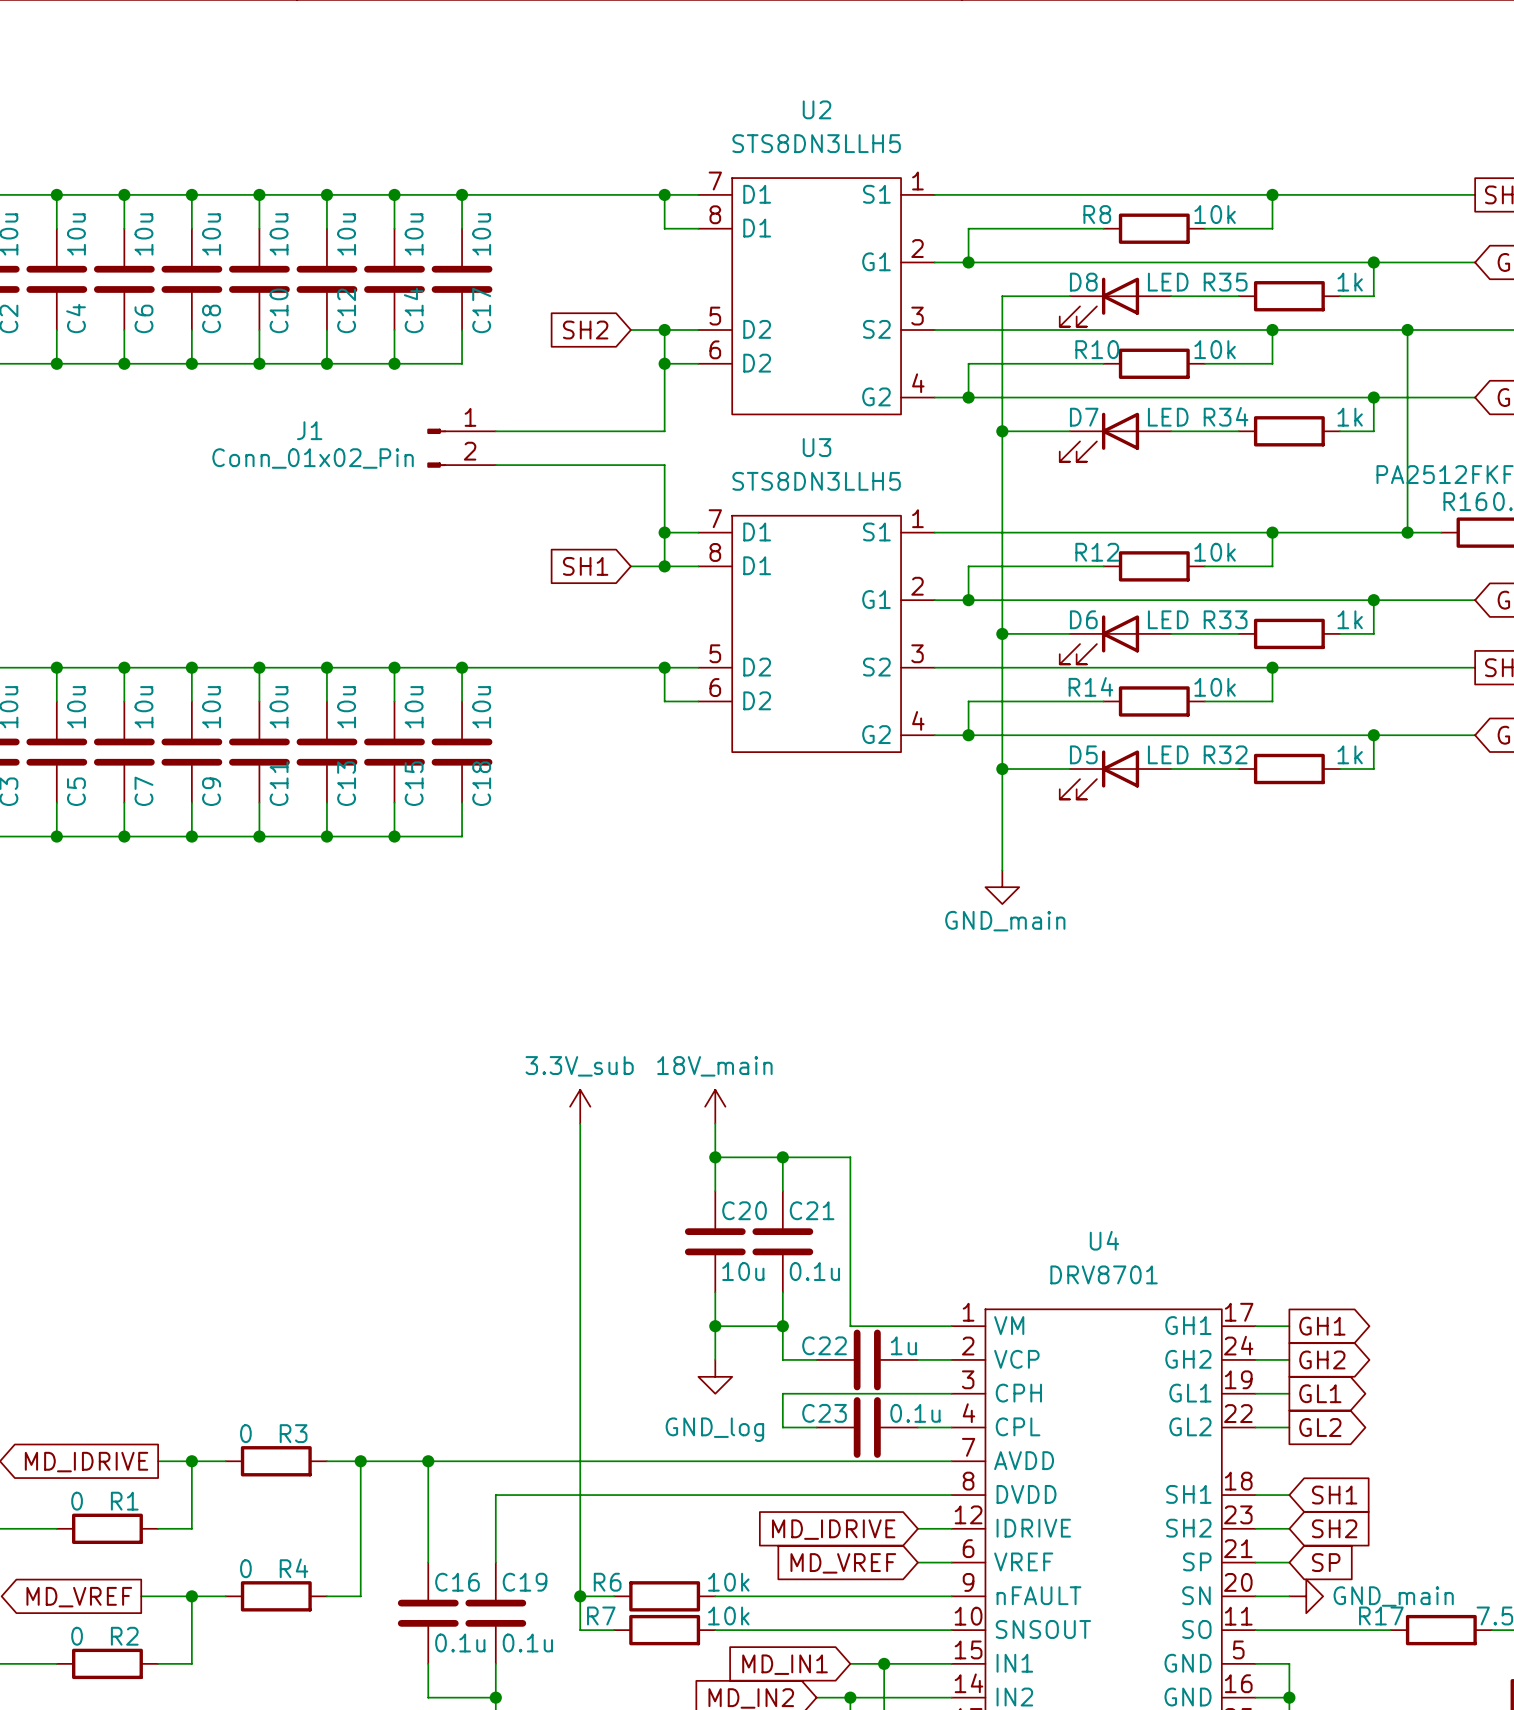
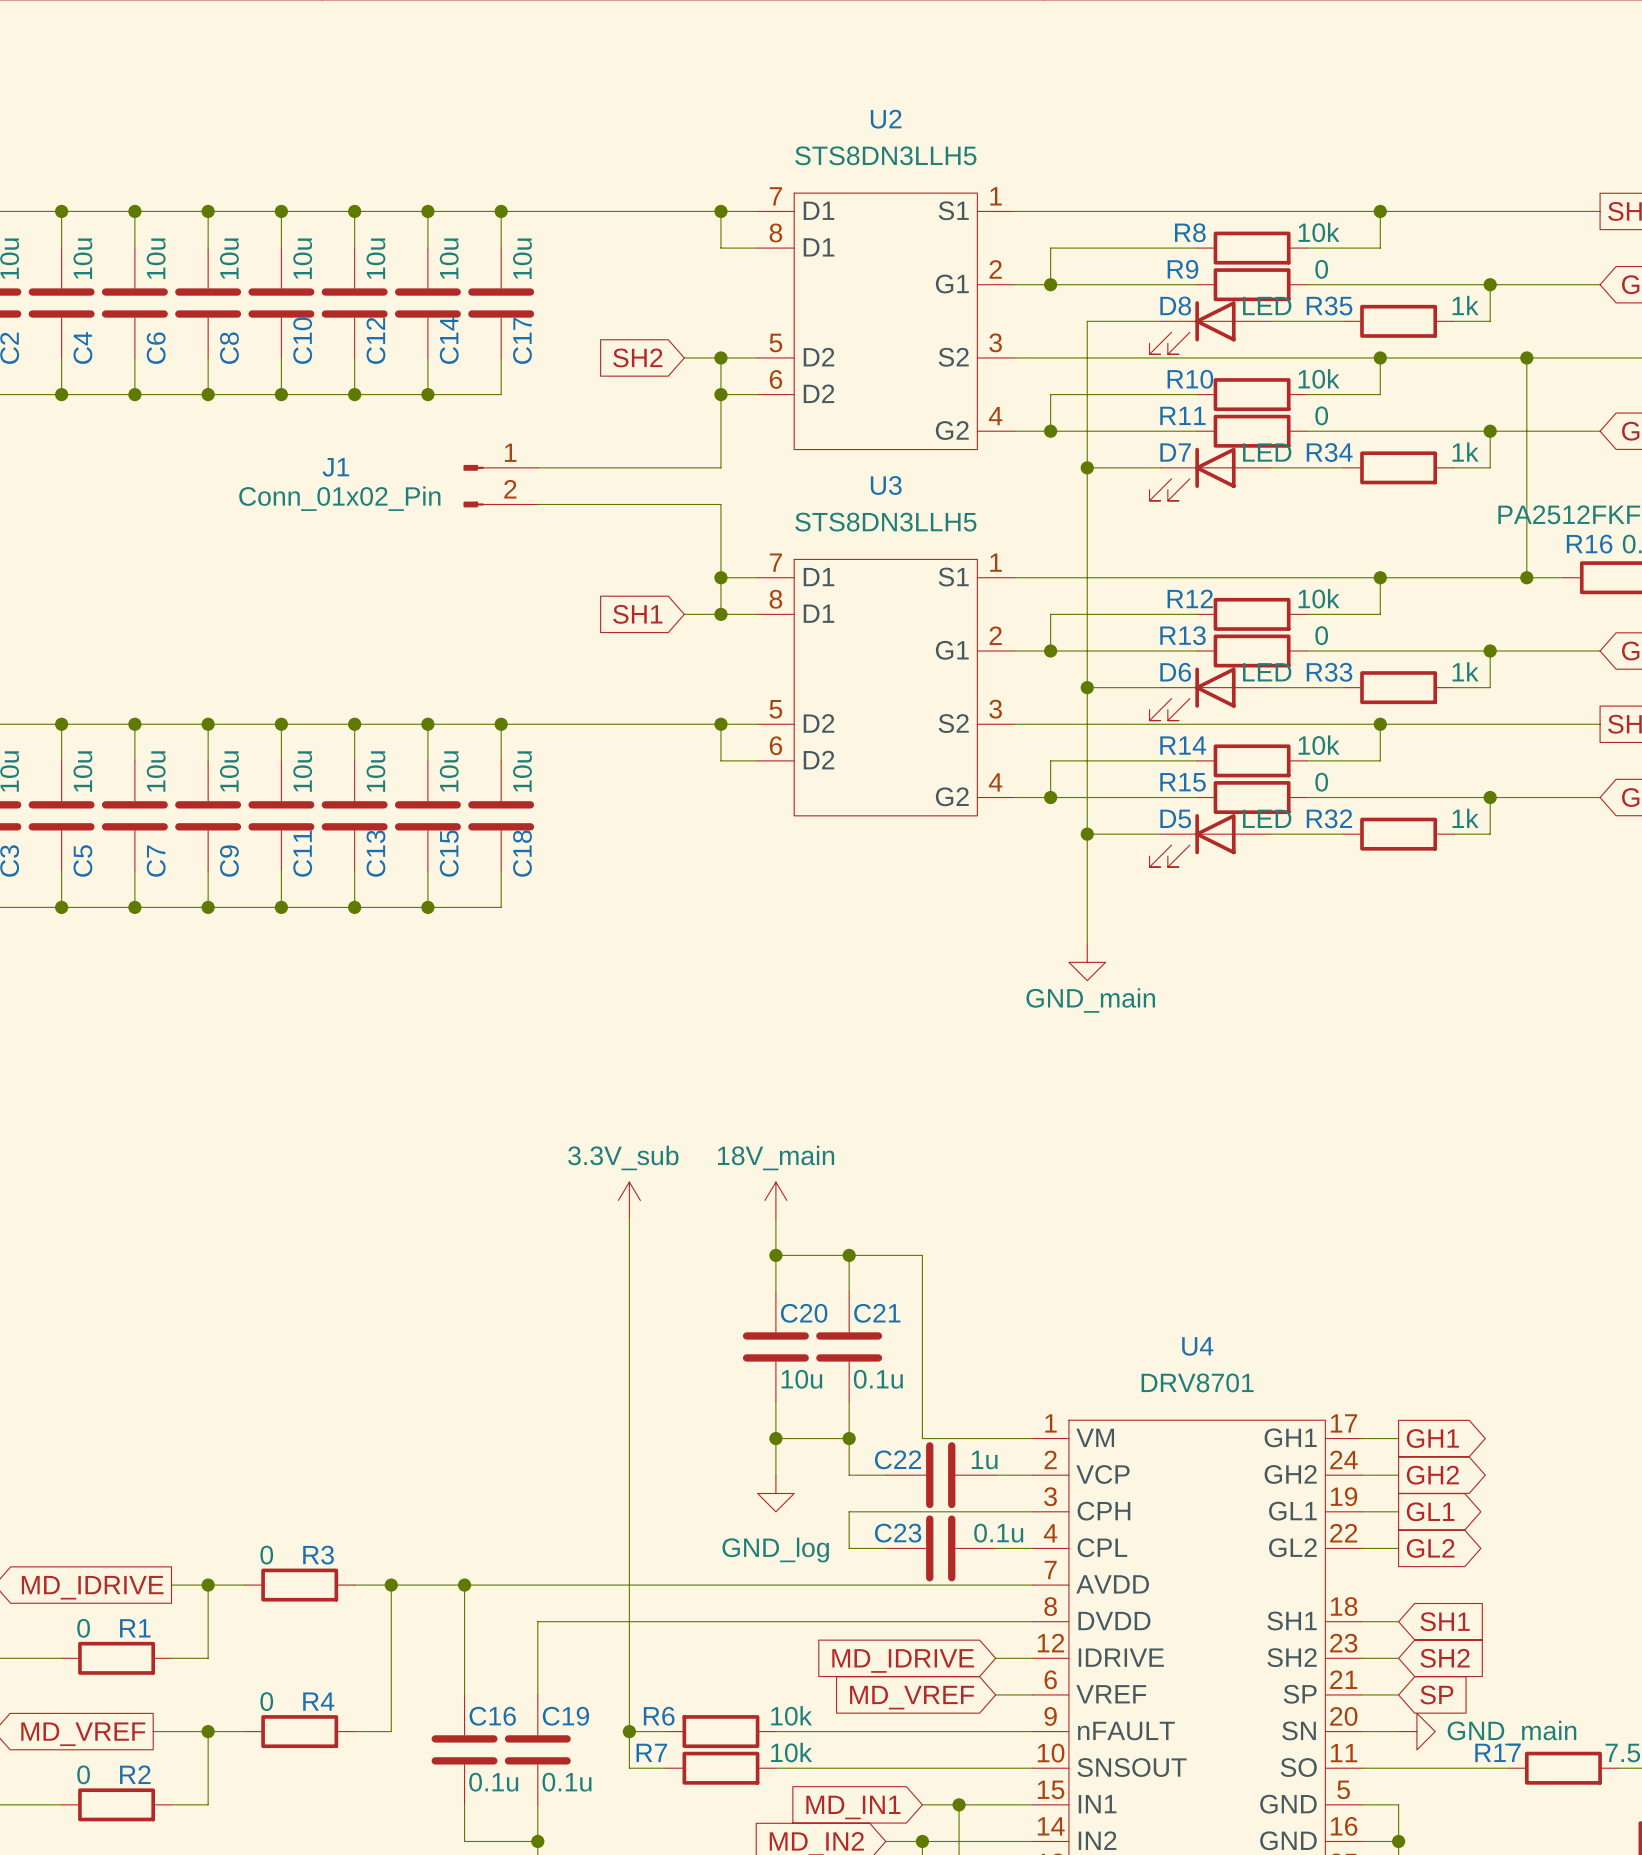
wire: (1103, 262) (1204, 262) -> none
R9: none -> 0 (1252, 284)
wire: (1103, 397) (1204, 397) -> none
R11: none -> 0 (1252, 431)
wire: (1103, 600) (1204, 600) -> none
R13: none -> 0 (1252, 651)
wire: (1103, 735) (1204, 735) -> none
R15: none -> 0 (1252, 797)

